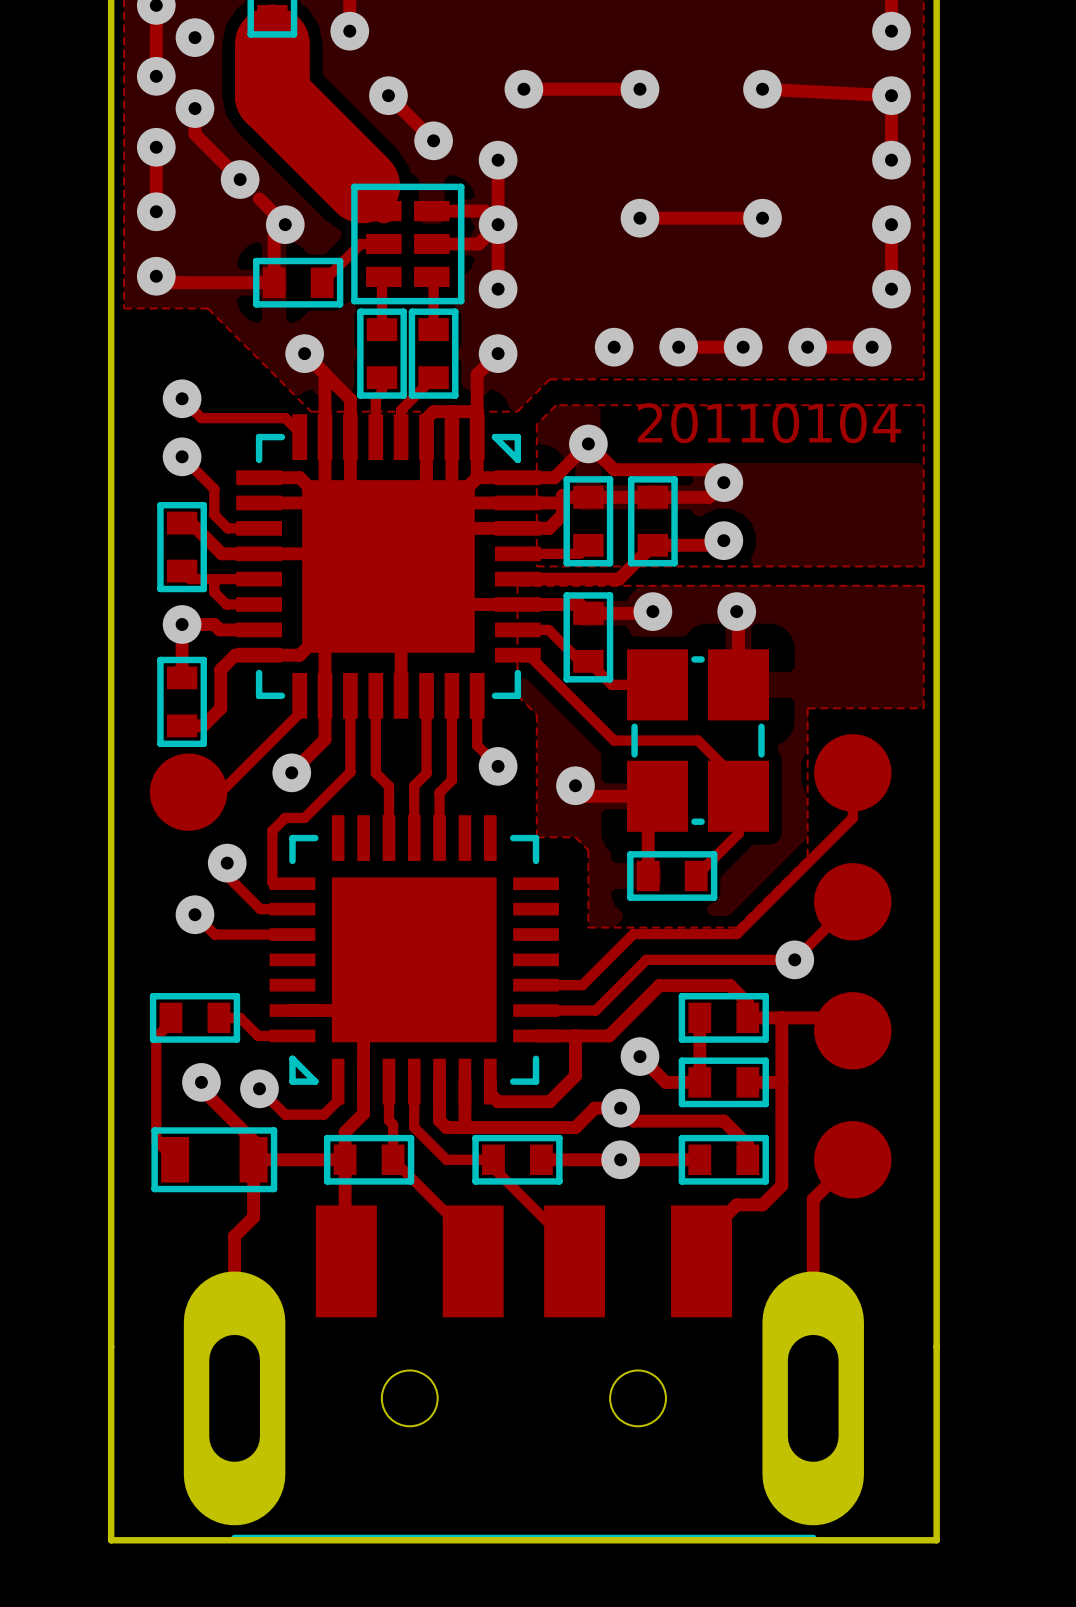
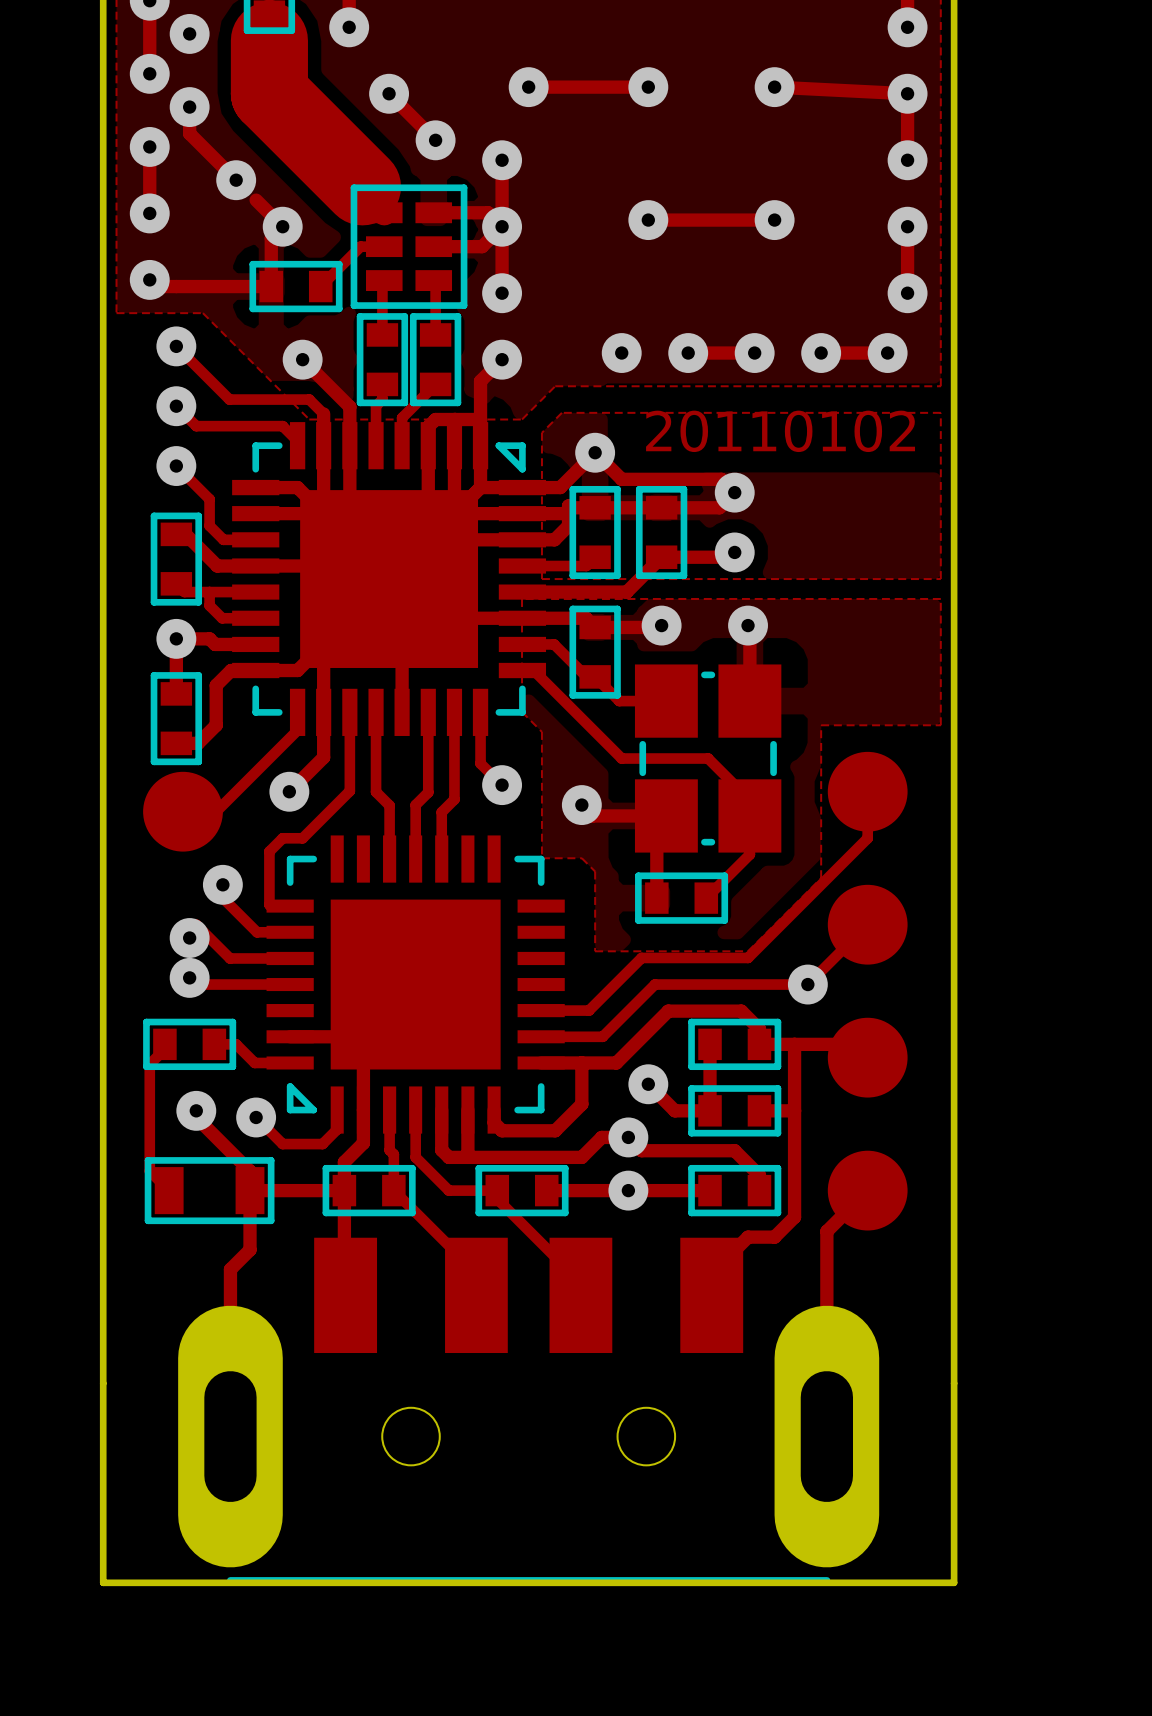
via: none -> (176, 346)
track: (325, 374) (325, 406) -> (176, 346) (229, 399) (309, 399) (323, 413)
text: 20110104 (769, 423) -> 20110102 (780, 431)
track: (194, 914) (214, 934) (234, 934) -> (189, 924) (196, 924) (230, 958)
track: none -> (189, 977) (196, 984) (290, 984)
via: none -> (189, 977)

